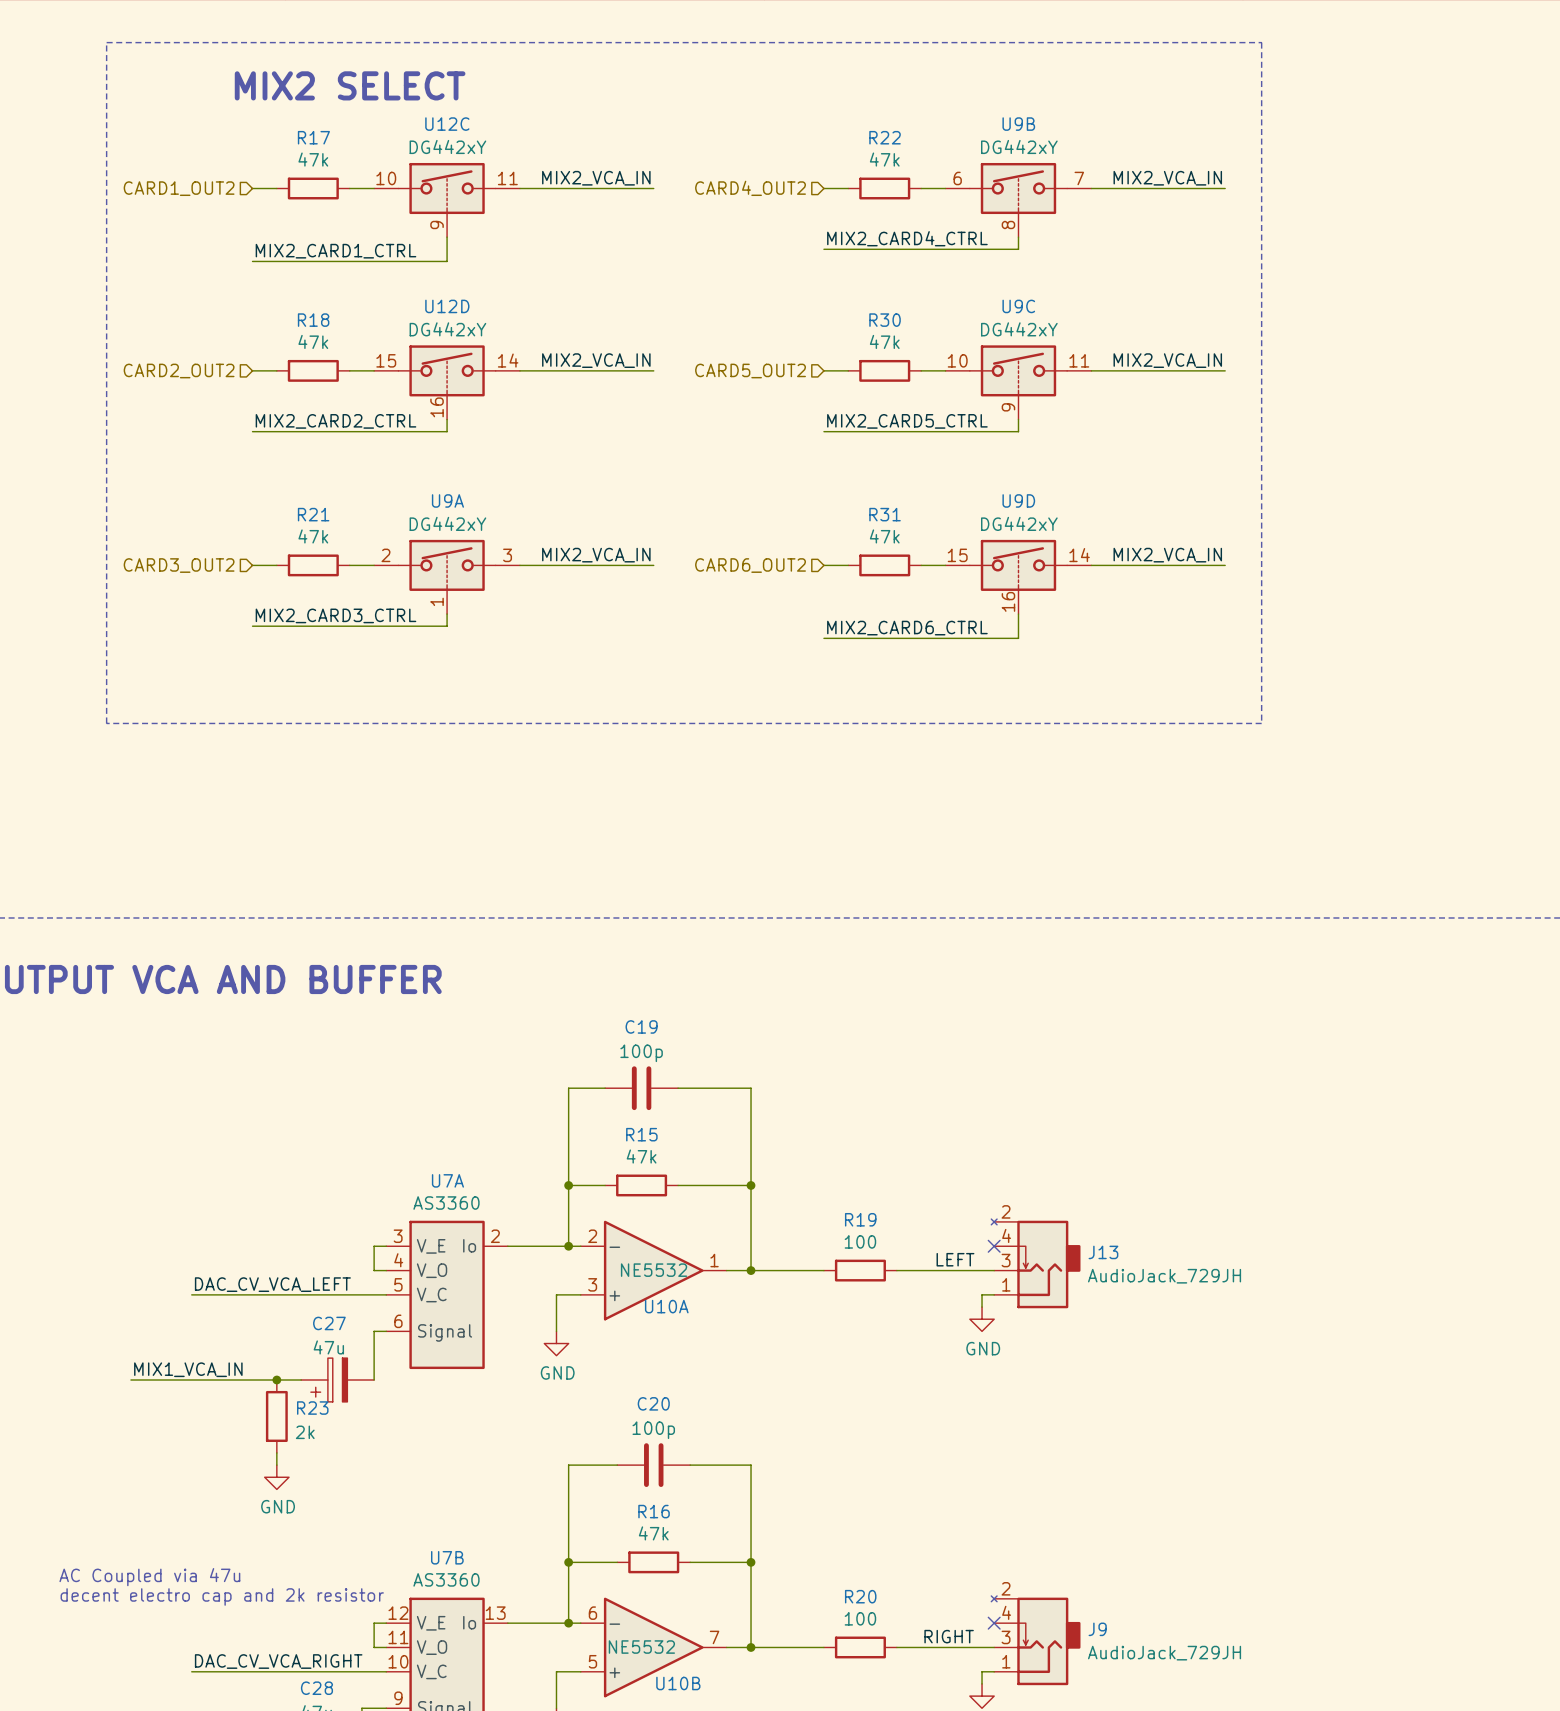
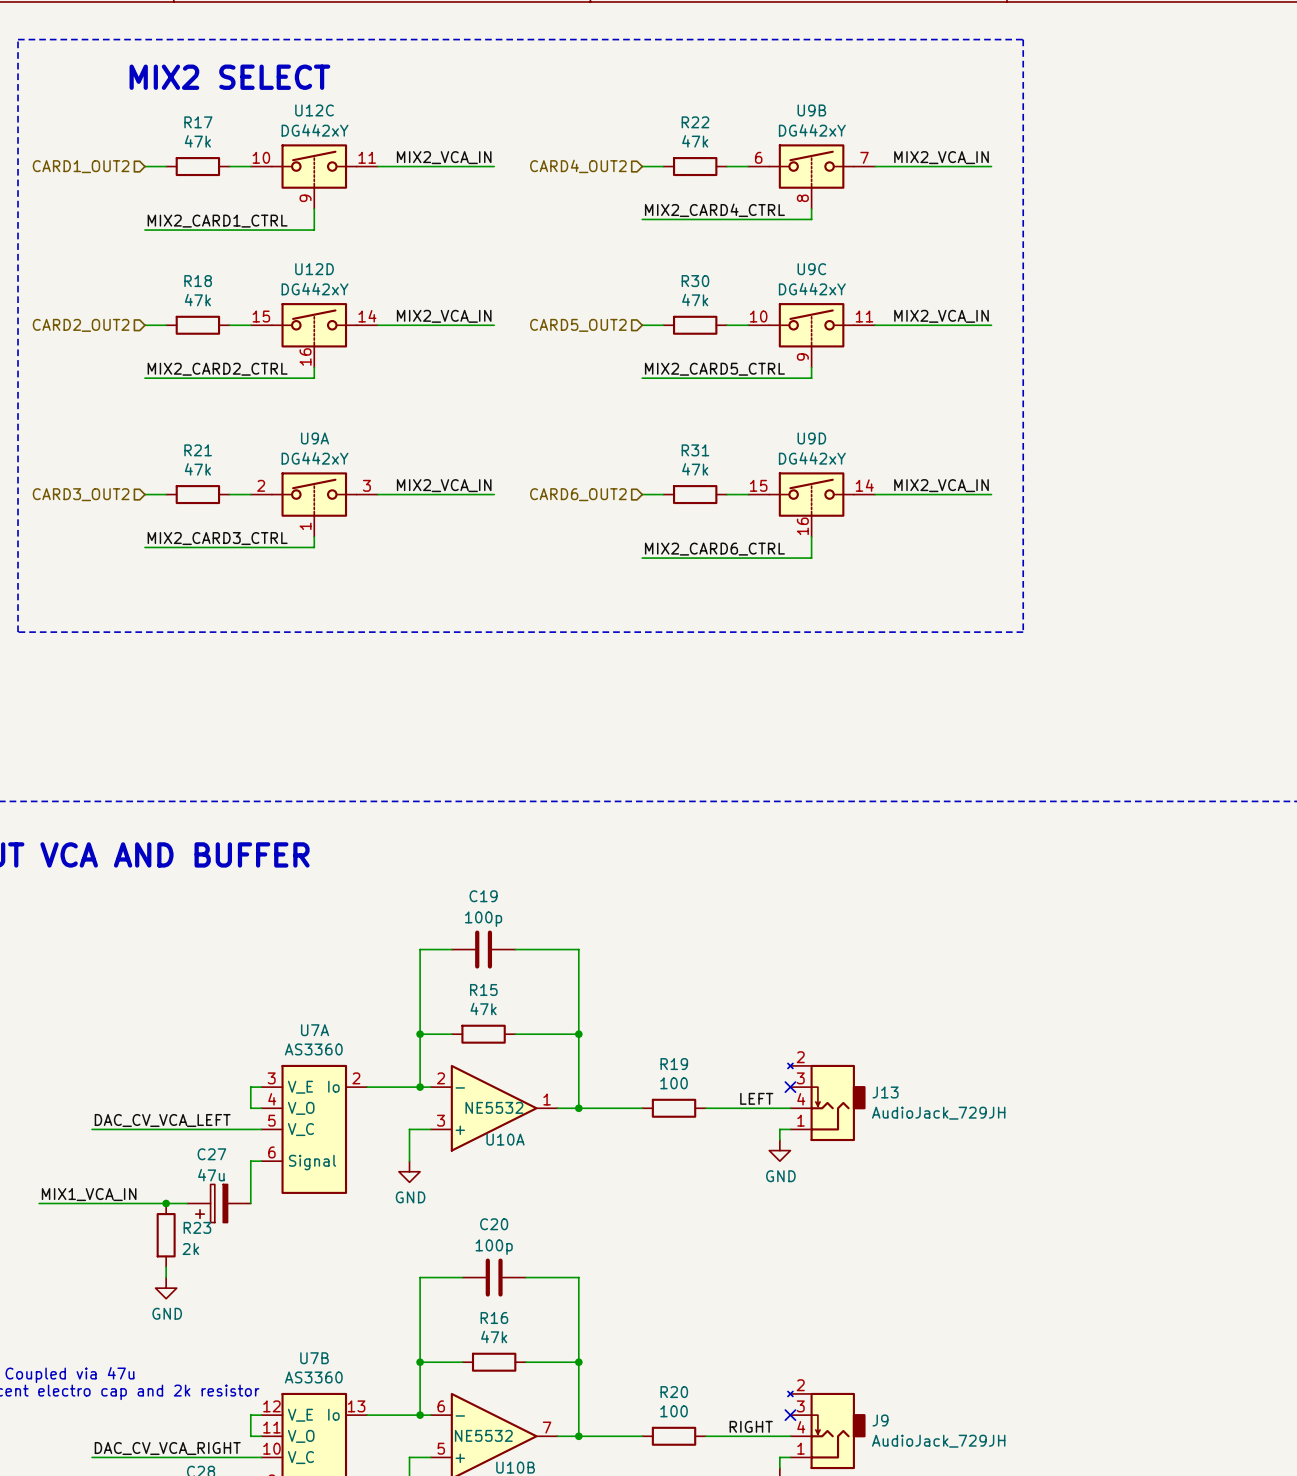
J13 pin number: 4 (1006, 1235) -> 3 (800, 1078)
J13 pin number: 3 (1006, 1260) -> 4 (801, 1099)
J9 pin number: 4 (1006, 1612) -> 3 (800, 1406)
J9 pin number: 3 (1006, 1637) -> 4 (801, 1427)

